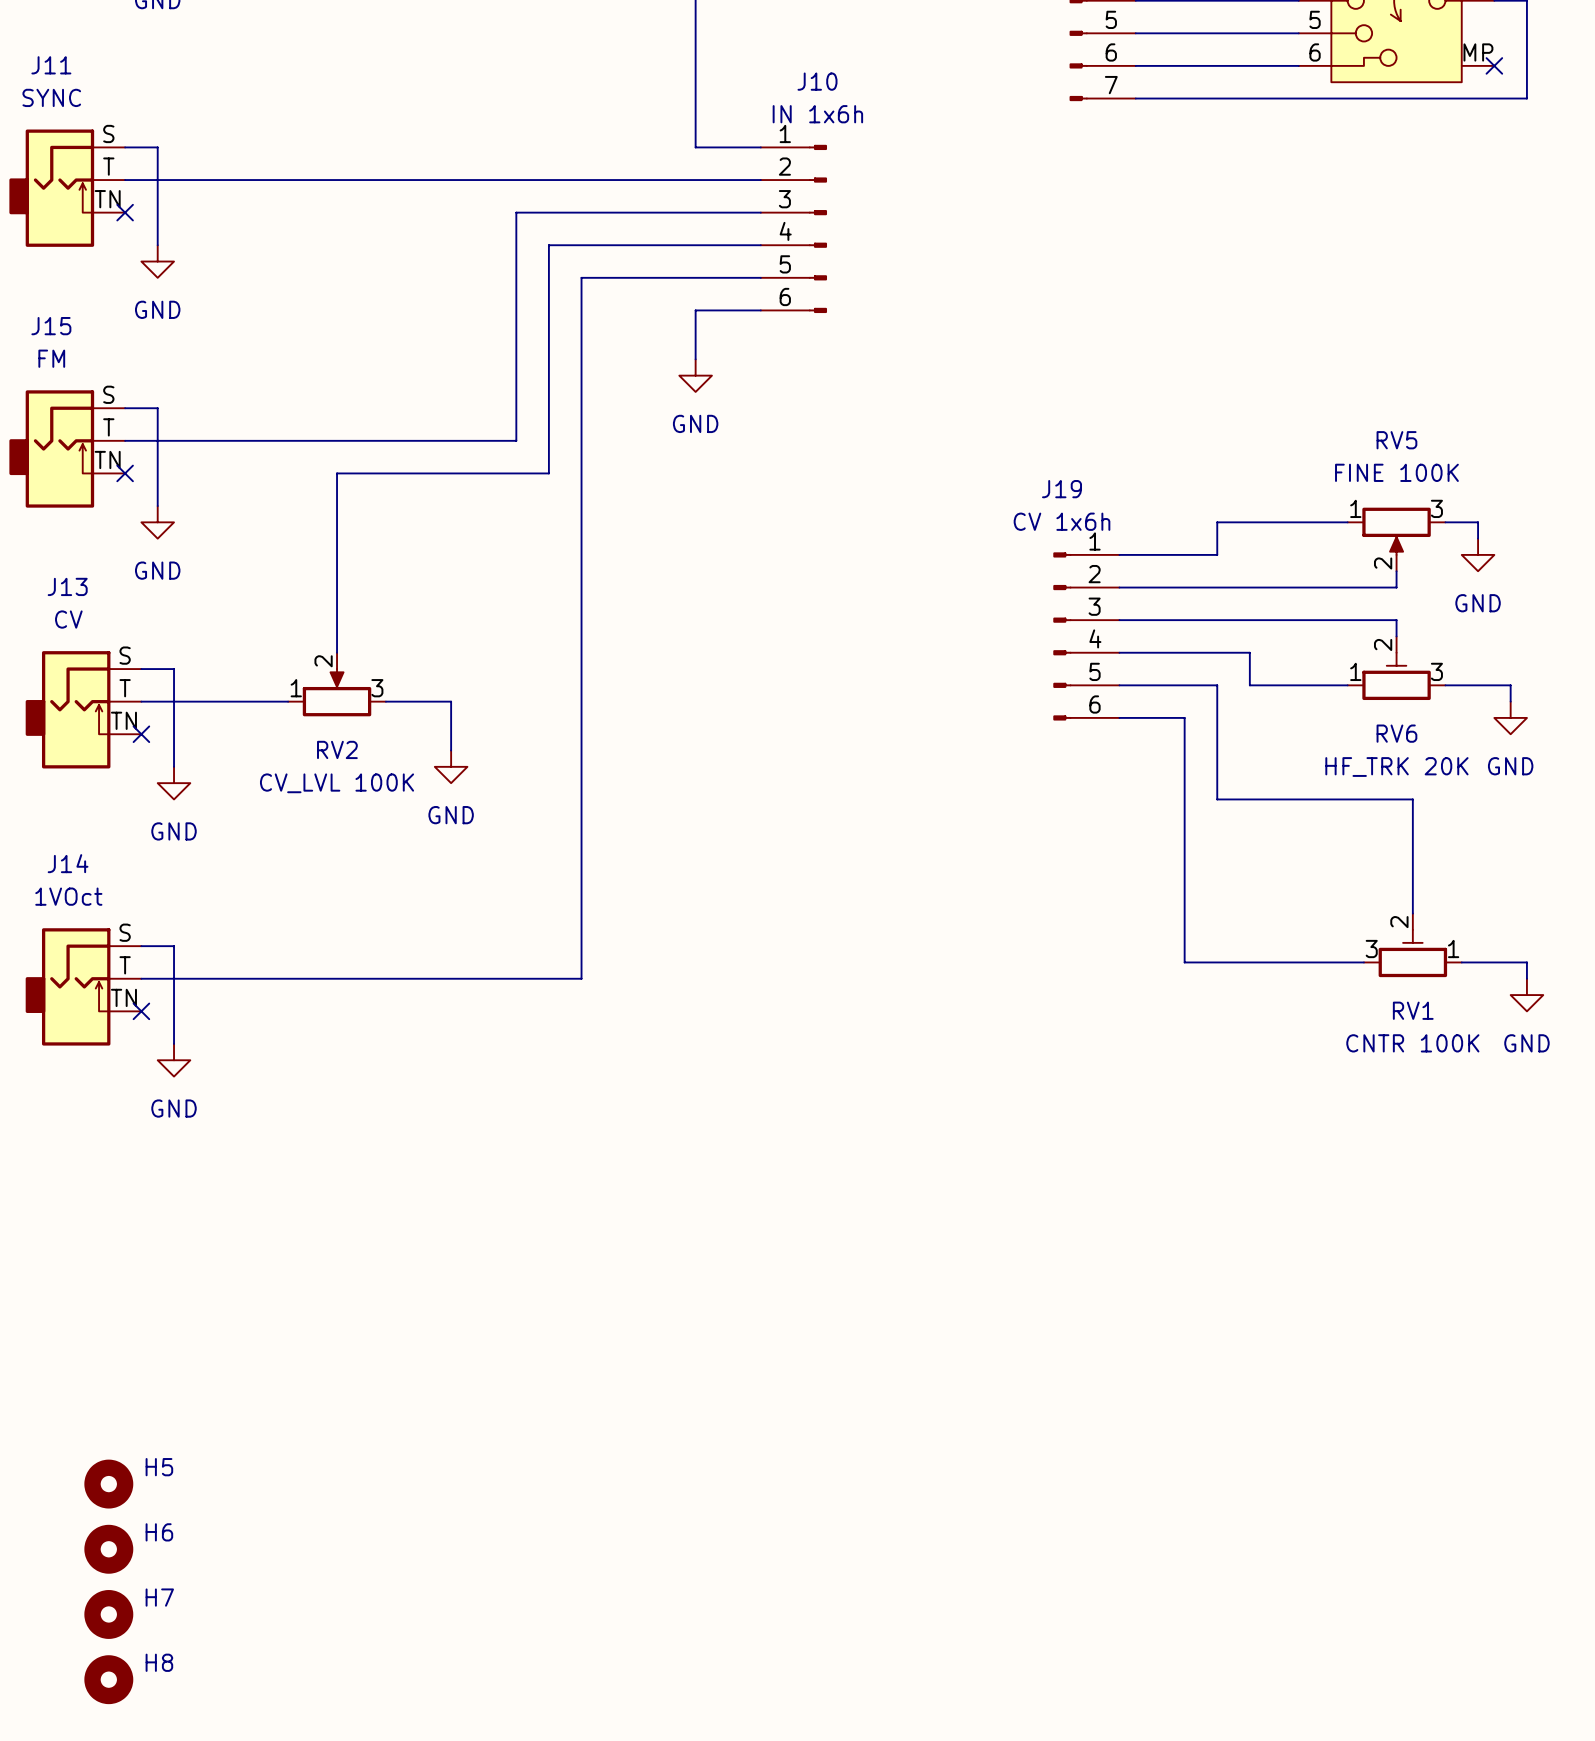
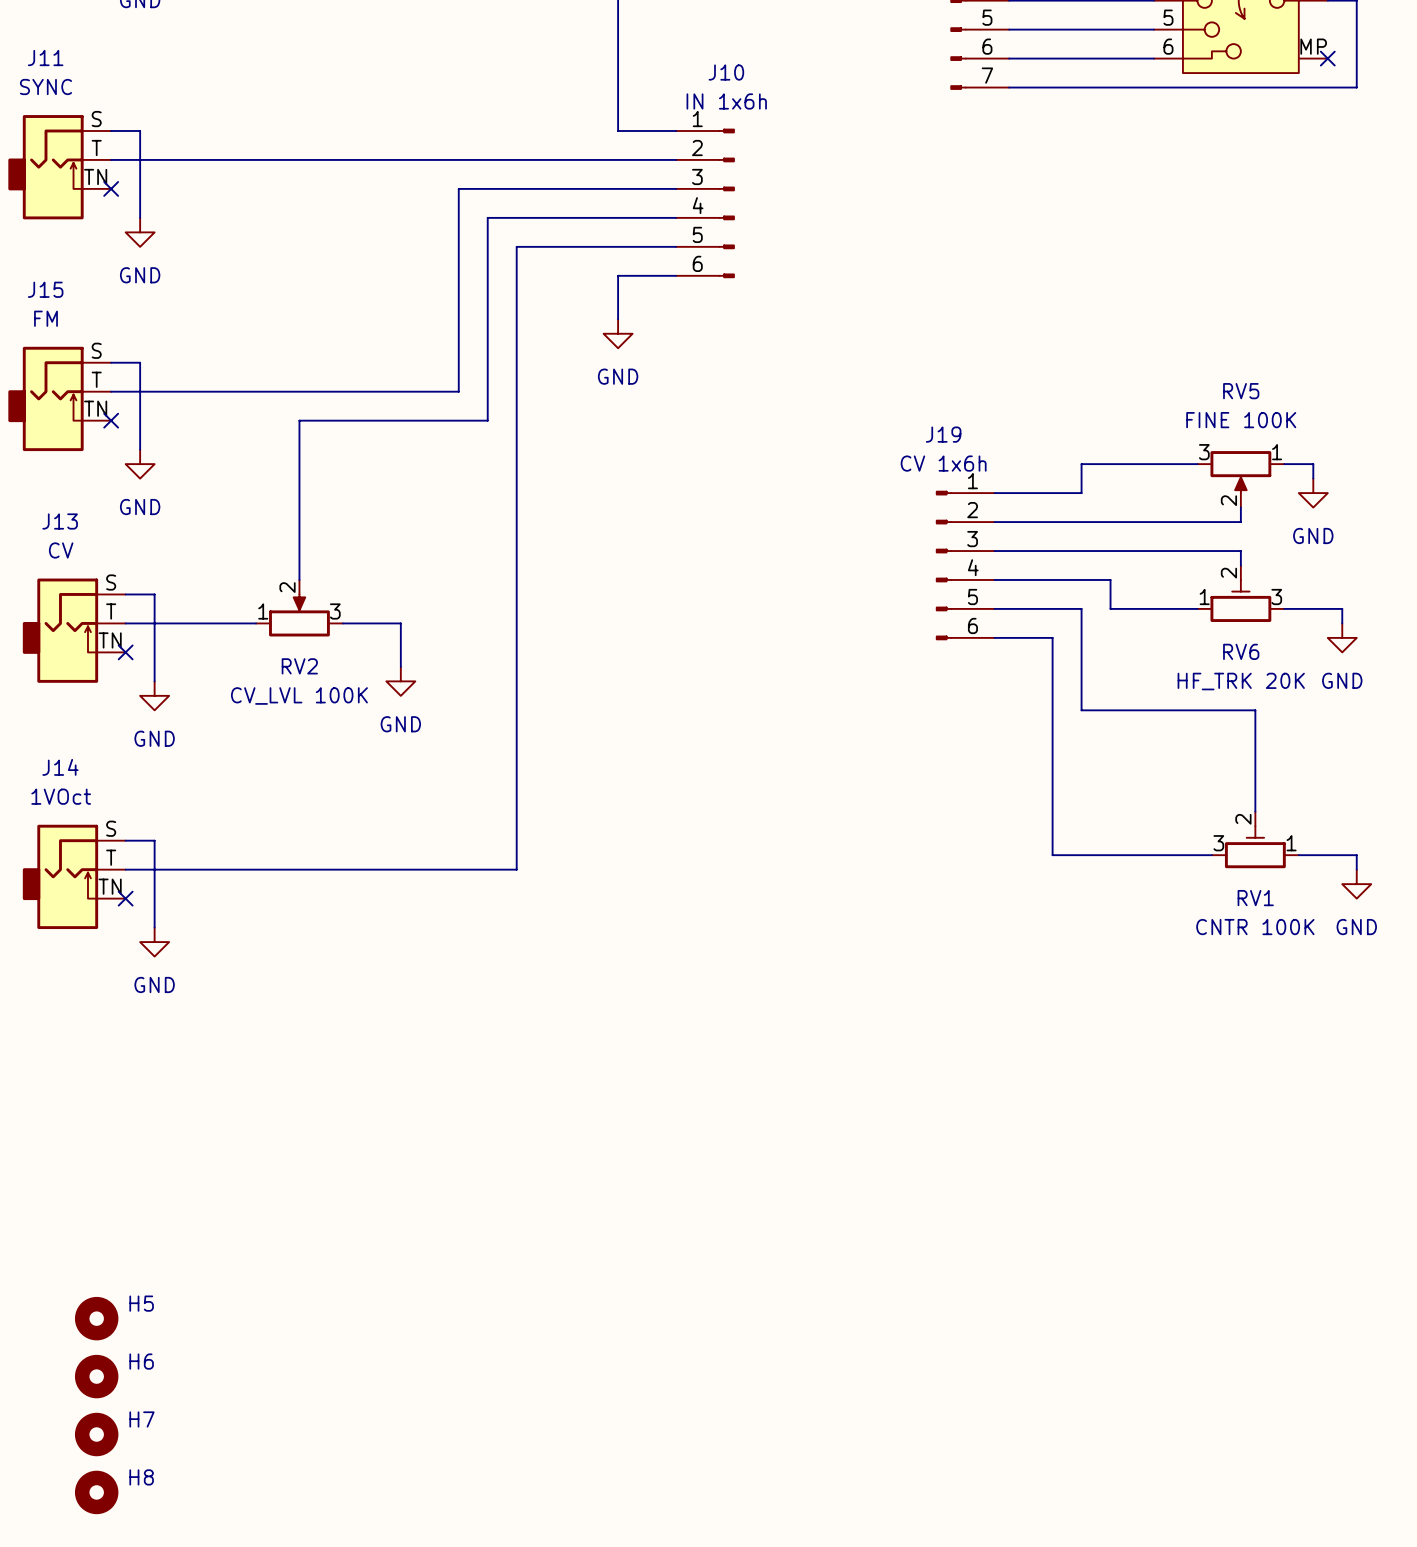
RV5 flip: as is (1396, 531) -> left-right (1240, 472)

